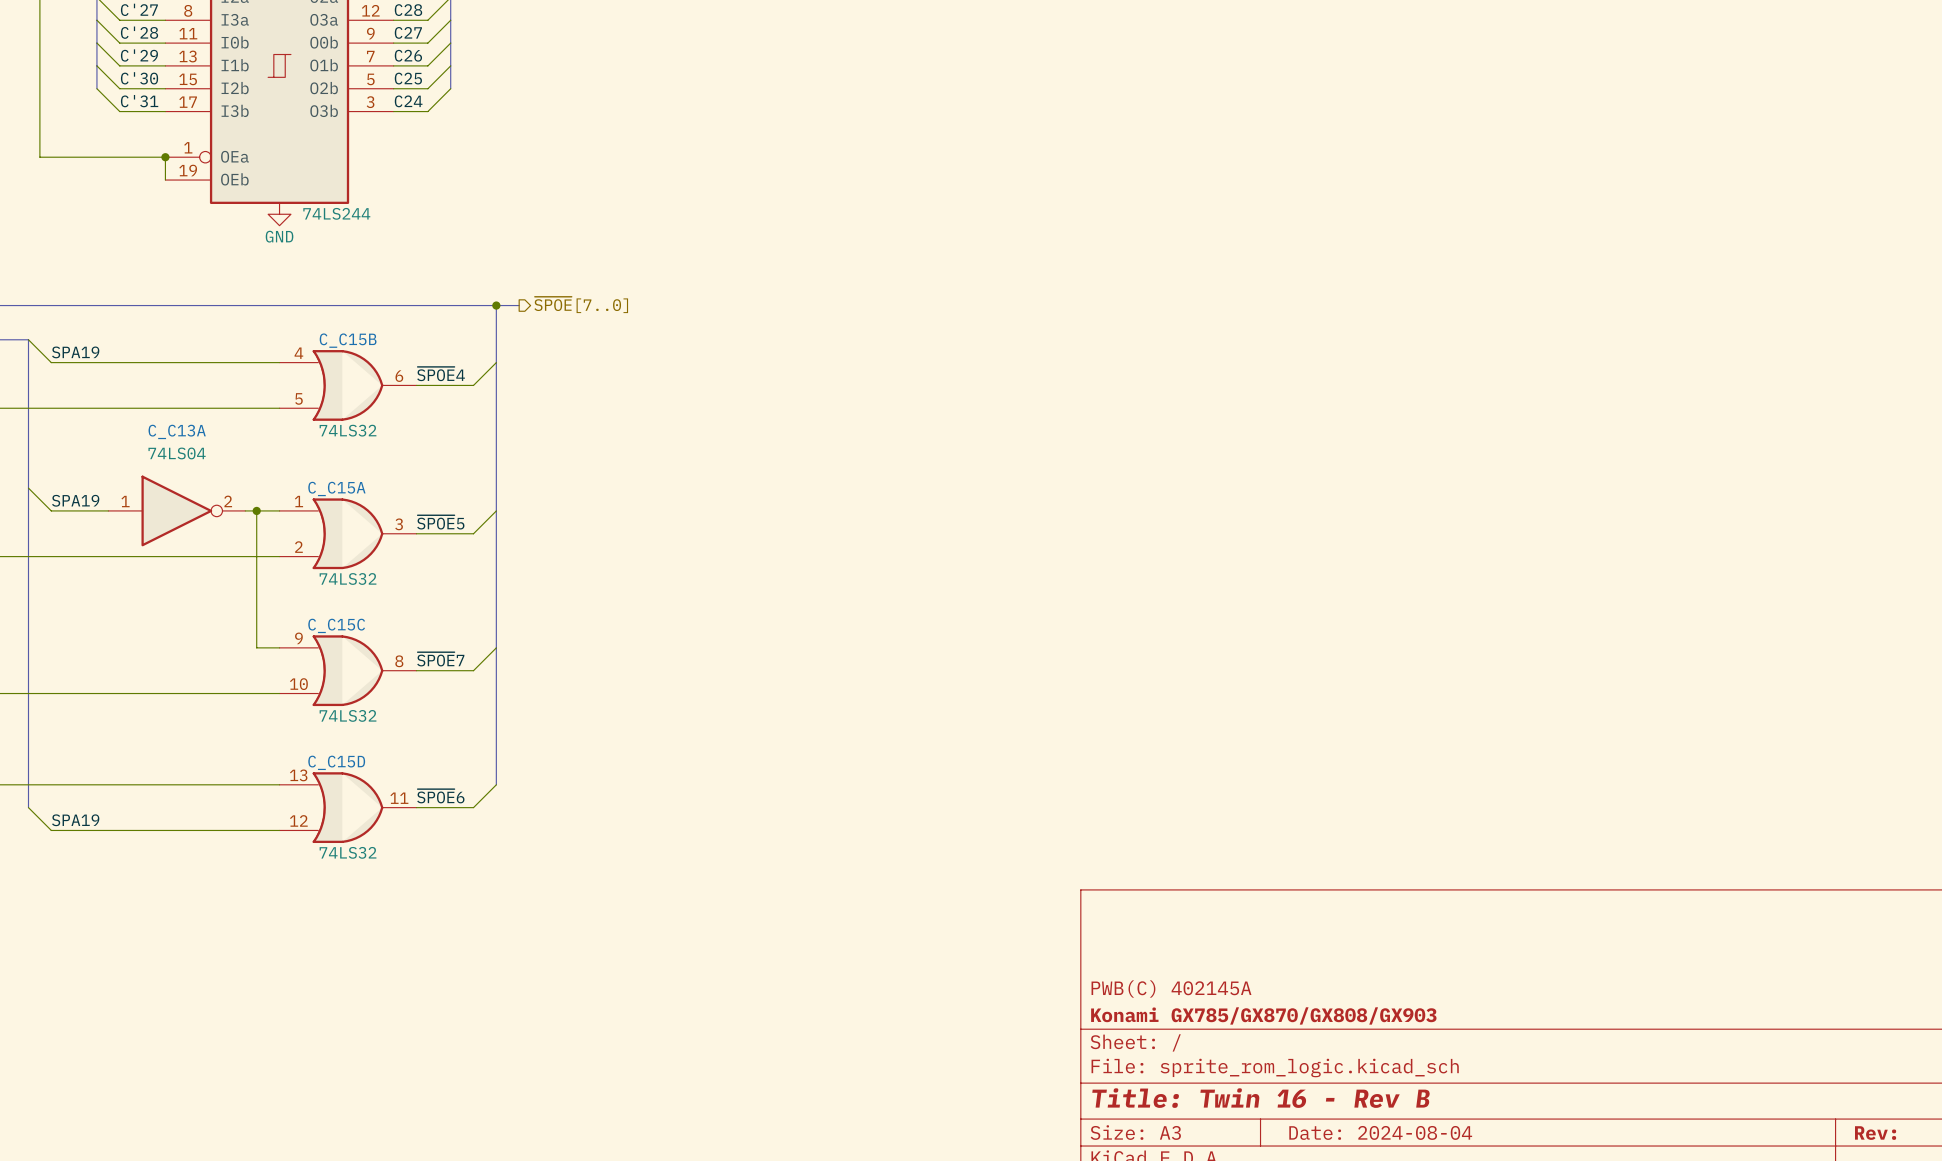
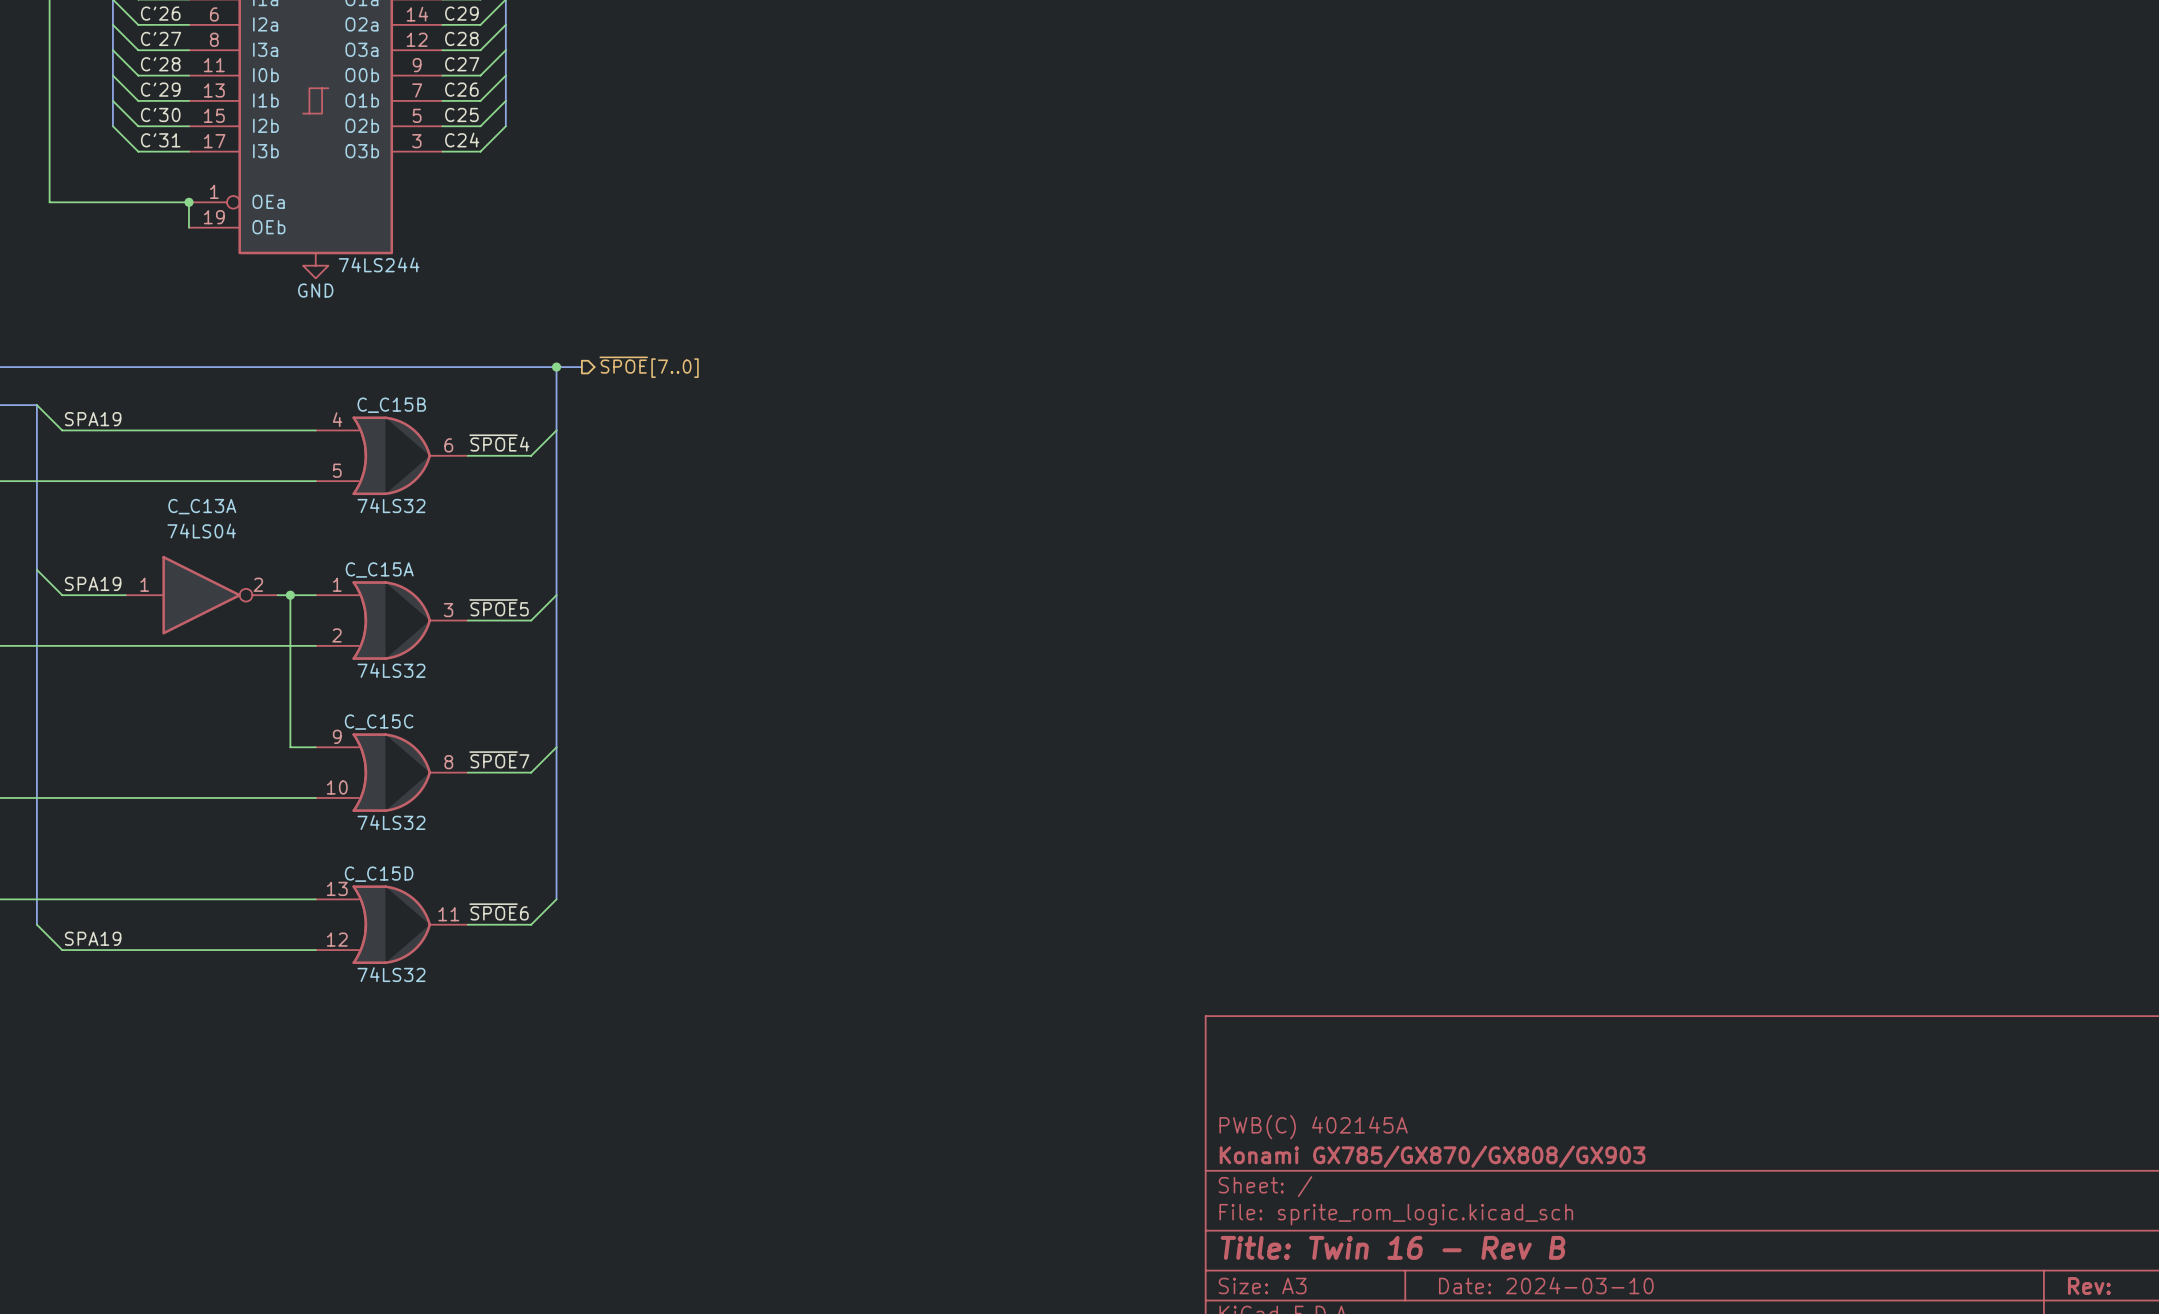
title block: Date: 2024-08-04 (1380, 1132) -> Date: 2024-03-10 (1546, 1285)

